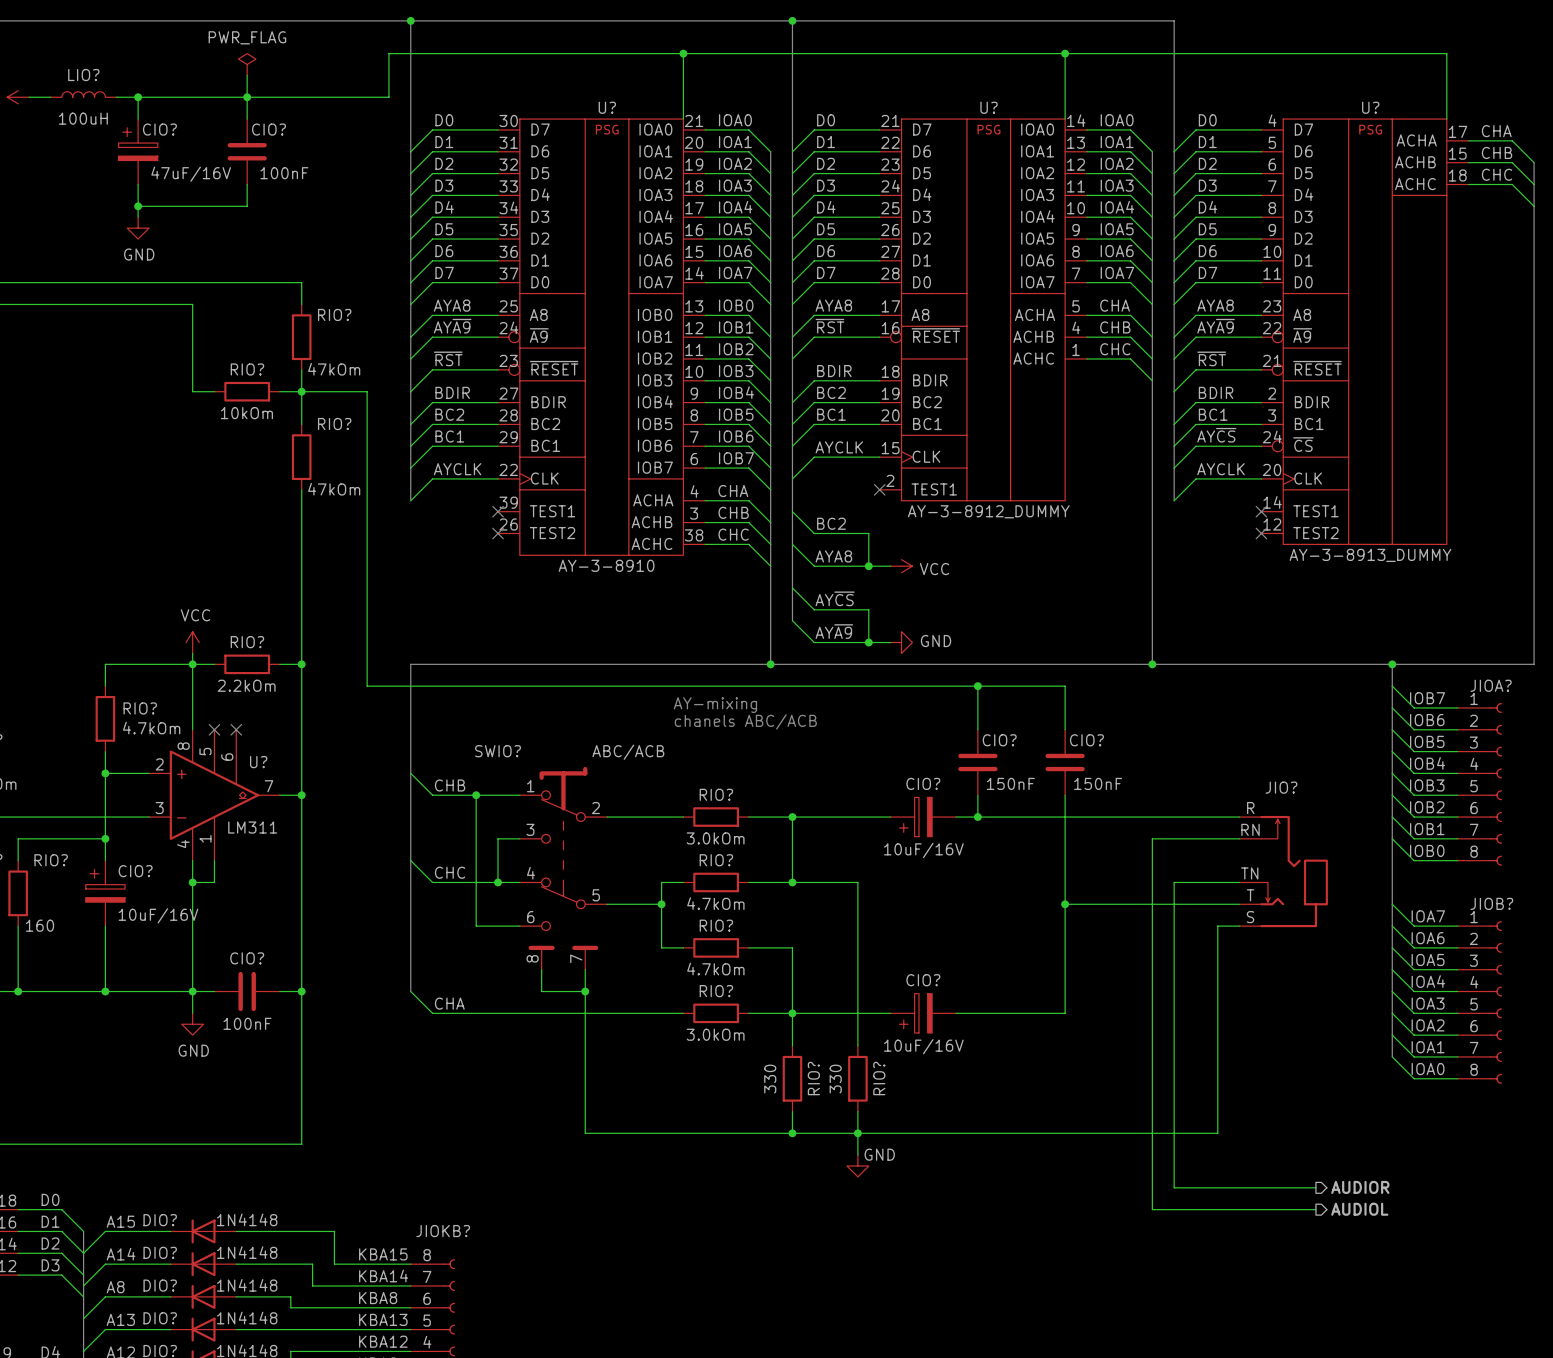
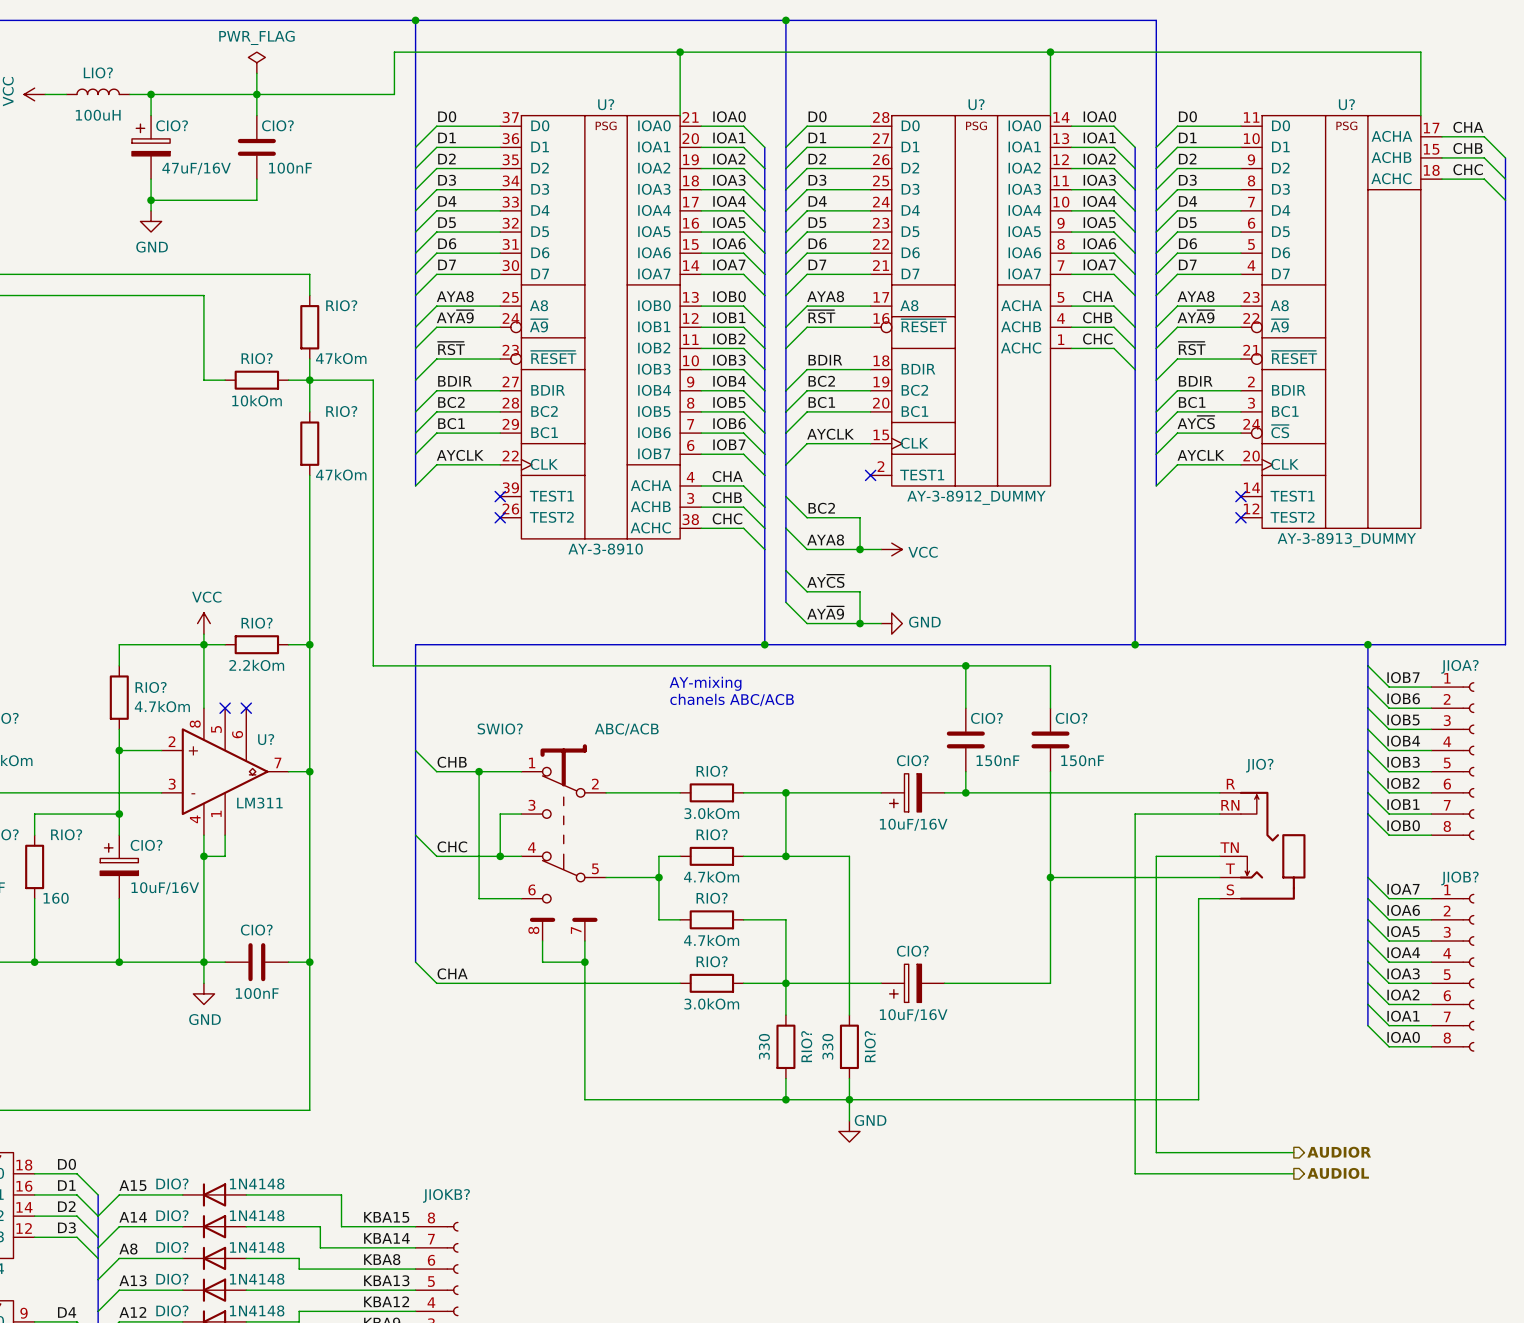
U? symbol: [498, 119, 706, 556] -> [500, 115, 702, 539]
U? symbol: [879, 119, 1087, 501] -> [870, 115, 1072, 486]
U? symbol: [1261, 119, 1469, 545] -> [1240, 115, 1443, 529]

